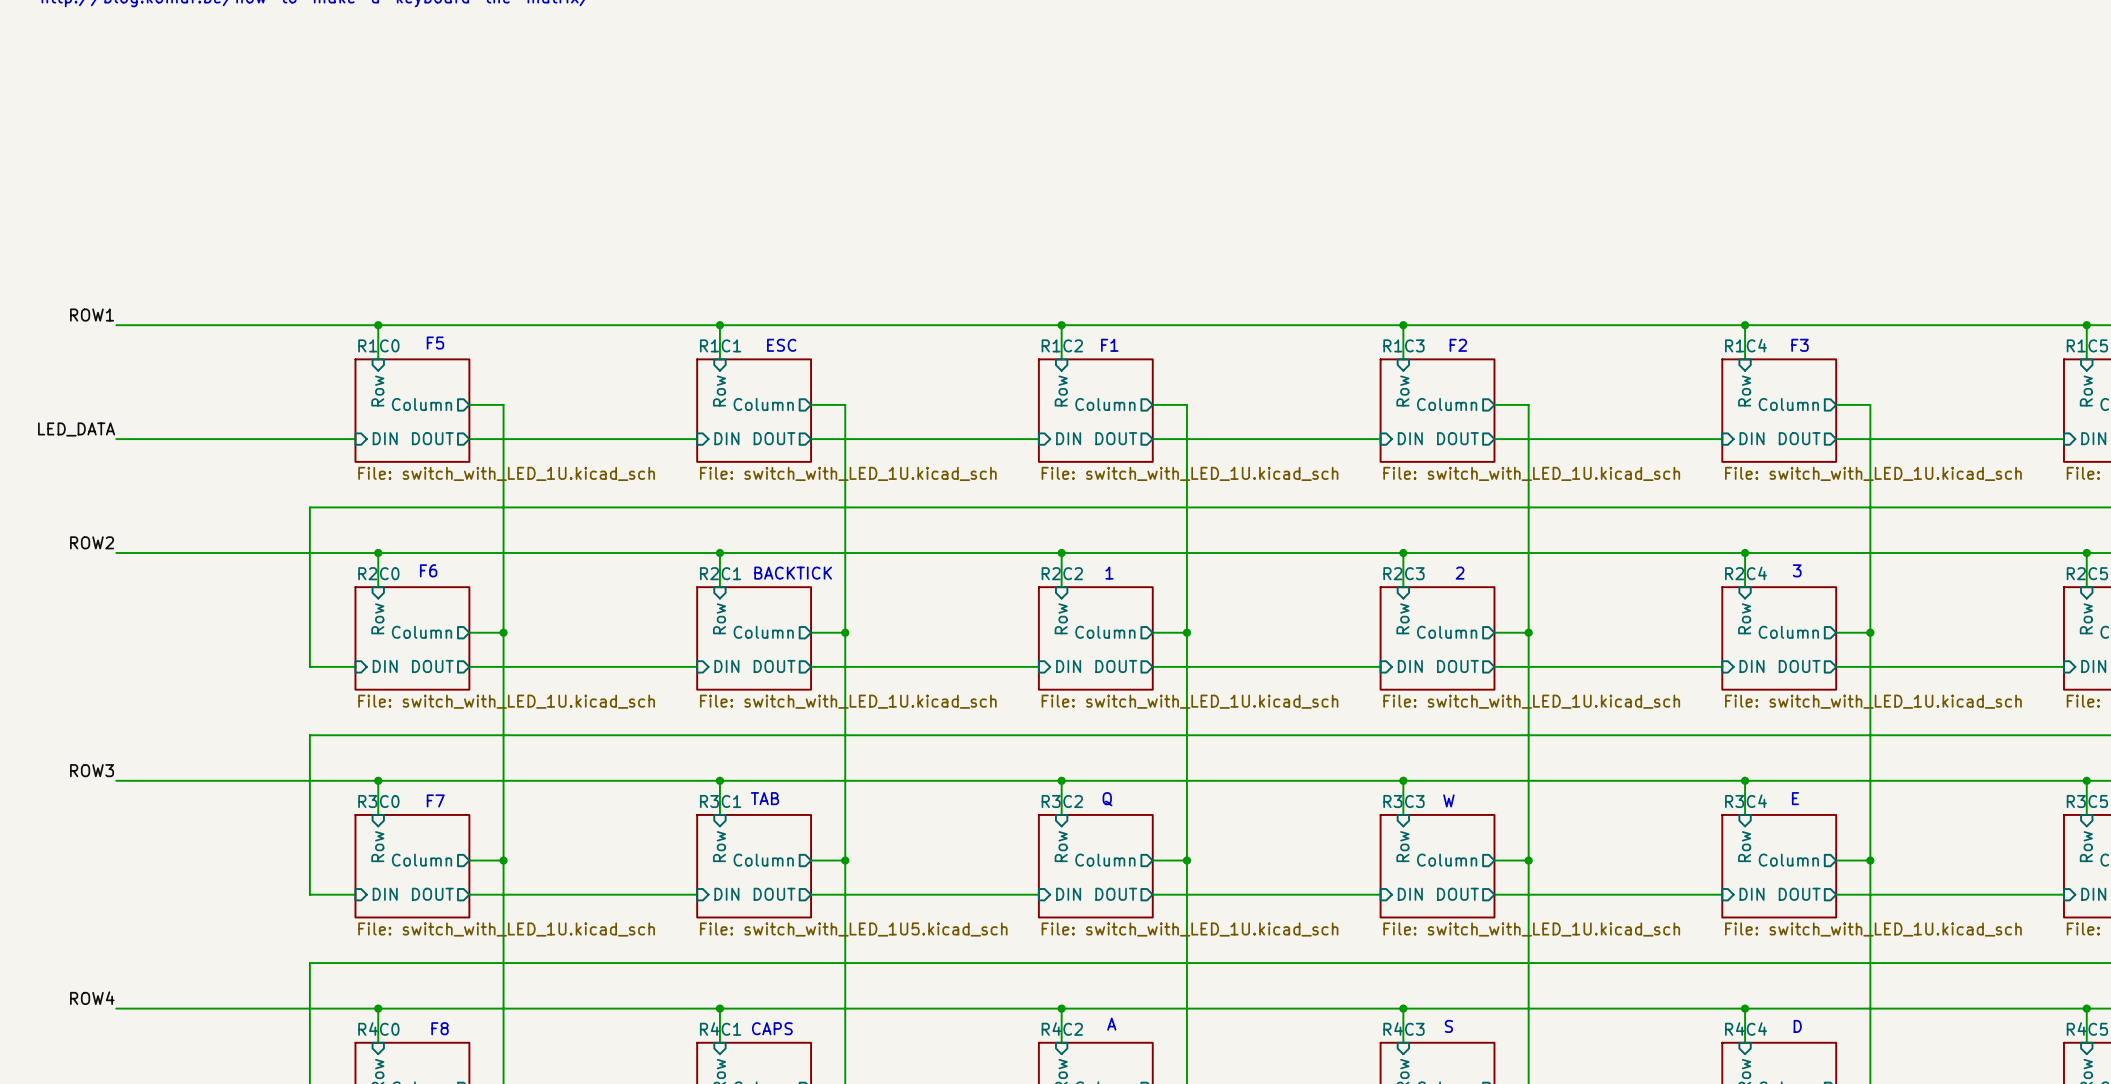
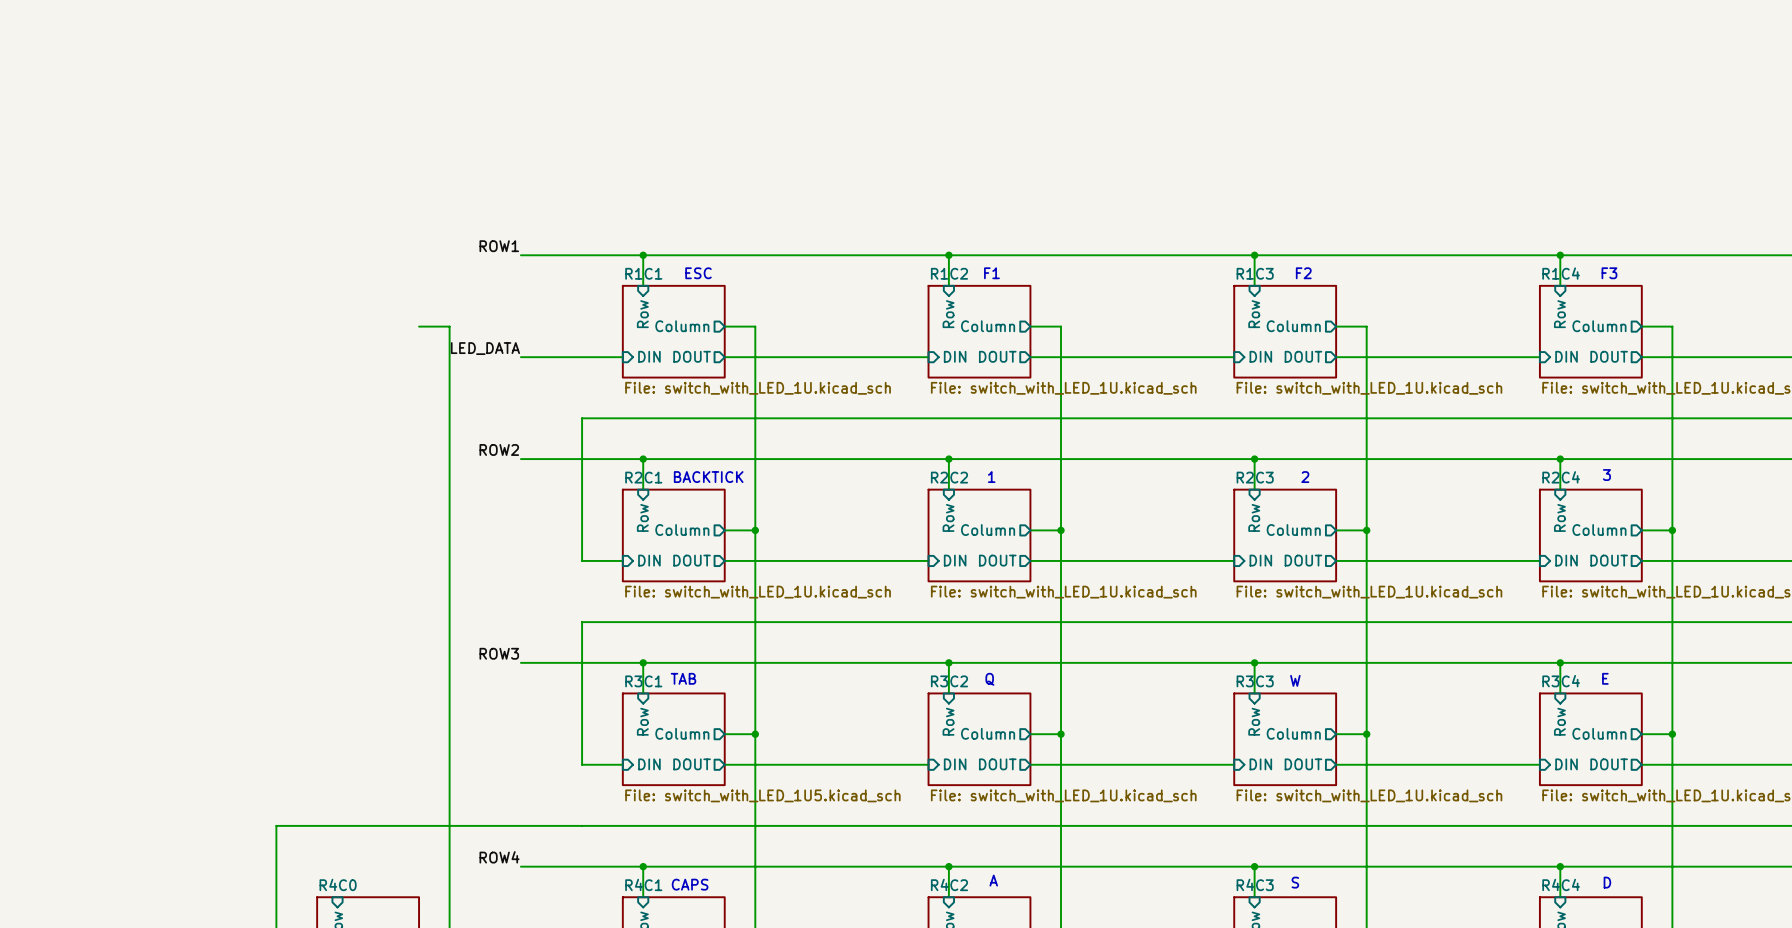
label: ROW1 (92, 315) -> none
label: none -> ROW1 (499, 246)
wire: (116, 325) (583, 325) -> none
wire: (378, 325) (378, 359) -> none
junction: (378, 325) -> none
text: F5 (435, 343) -> none
sheet pin: Row (377, 391) -> none
sheet pin: Column (422, 404) -> none
sheet R1C0: File: switch_with_LED_1U.kicad_sch (412, 410) -> none
label: LED_DATA (76, 429) -> none
label: none -> LED_DATA (485, 348)
sheet pin: DIN (385, 438) -> none
sheet pin: DOUT (432, 438) -> none
wire: (116, 439) (355, 439) -> none
wire: (469, 439) (583, 439) -> none
wire: (651, 507) (309, 507) (309, 666) (355, 666) -> none
label: ROW2 (92, 542) -> none
label: none -> ROW2 (499, 449)
wire: (116, 553) (583, 553) -> none
wire: (378, 553) (378, 587) -> none
junction: (378, 553) -> none
text: F6 (428, 570) -> none
sheet pin: Row (377, 618) -> none
sheet pin: Column (422, 632) -> none
wire: (469, 632) (503, 632) -> none
junction: (503, 632) -> none
sheet R2C0: File: switch_with_LED_1U.kicad_sch (412, 638) -> none
sheet pin: DIN (385, 666) -> none
sheet pin: DOUT (432, 666) -> none
wire: (469, 666) (651, 666) -> (582, 418) (582, 560)
wire: (651, 735) (309, 735) (309, 894) (355, 894) -> none
label: ROW3 (92, 770) -> none
label: none -> ROW3 (499, 653)
wire: (116, 780) (583, 780) -> none
wire: (378, 780) (378, 814) -> none
junction: (378, 780) -> none
text: F7 (435, 800) -> none
sheet pin: Row (377, 846) -> none
sheet pin: Column (422, 860) -> none
wire: (469, 860) (503, 860) -> none
junction: (503, 860) -> none
sheet R3C0: File: switch_with_LED_1U.kicad_sch (412, 866) -> none
sheet pin: DIN (385, 894) -> none
sheet pin: DOUT (432, 894) -> none
wire: (469, 894) (651, 894) -> (582, 622) (582, 764)
label: ROW4 (92, 998) -> none
label: none -> ROW4 (499, 857)
wire: (116, 1008) (583, 1008) -> none
wire: (378, 1008) (378, 1042) -> none
junction: (378, 1008) -> none
text: F8 (440, 1028) -> none

